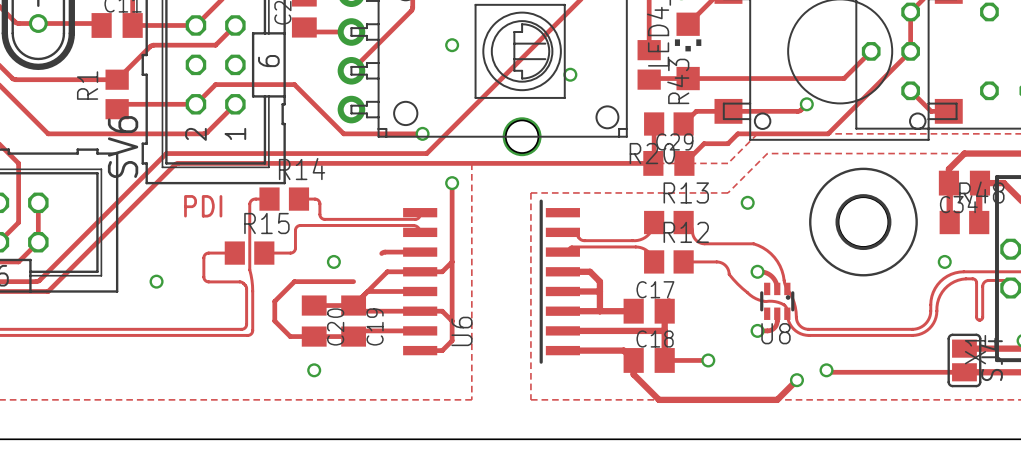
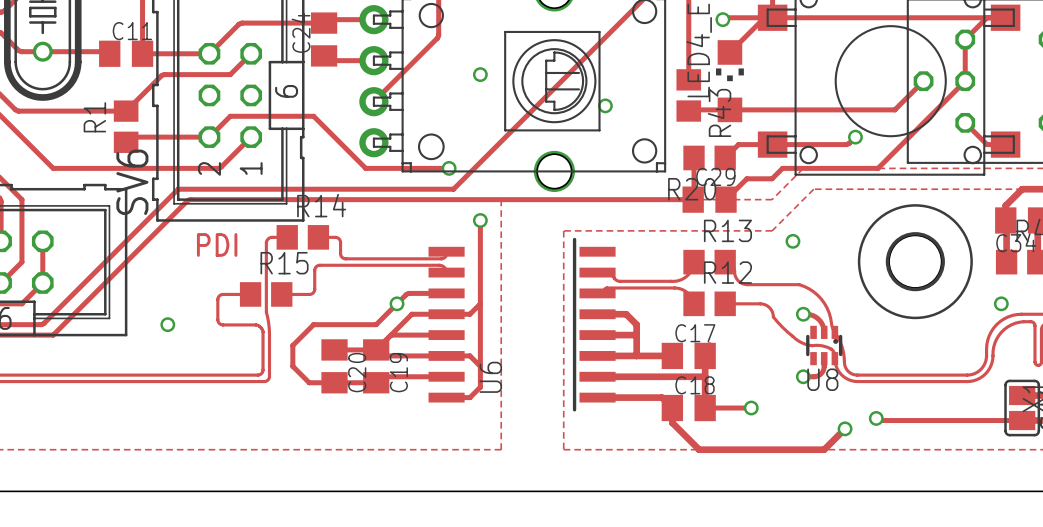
track: none -> (405, 294) (376, 324)
via position: (333, 261) -> (397, 303)
via: (314, 370) -> none

